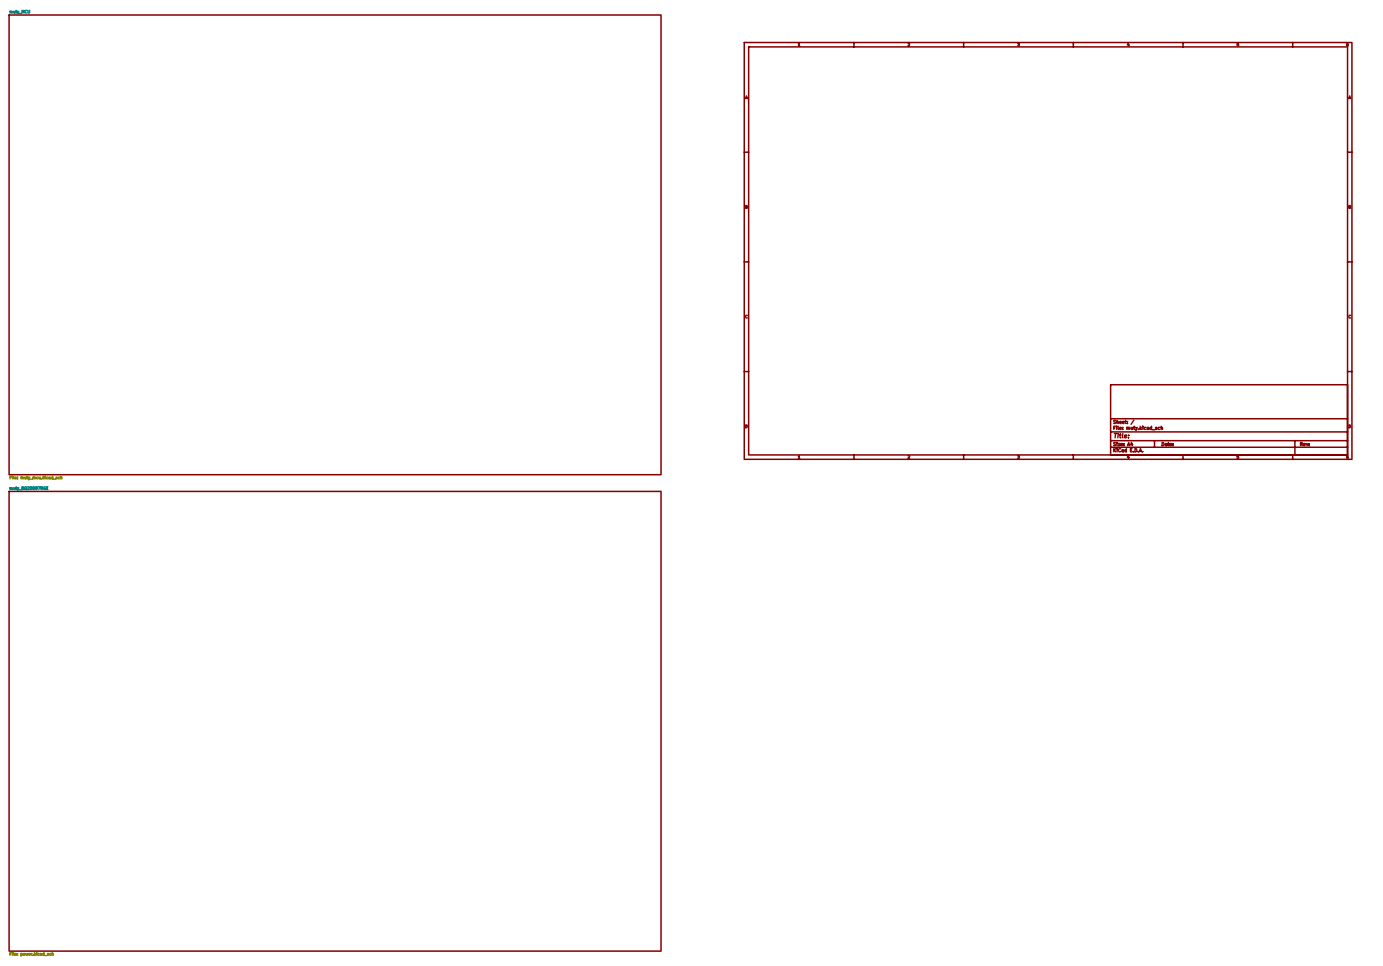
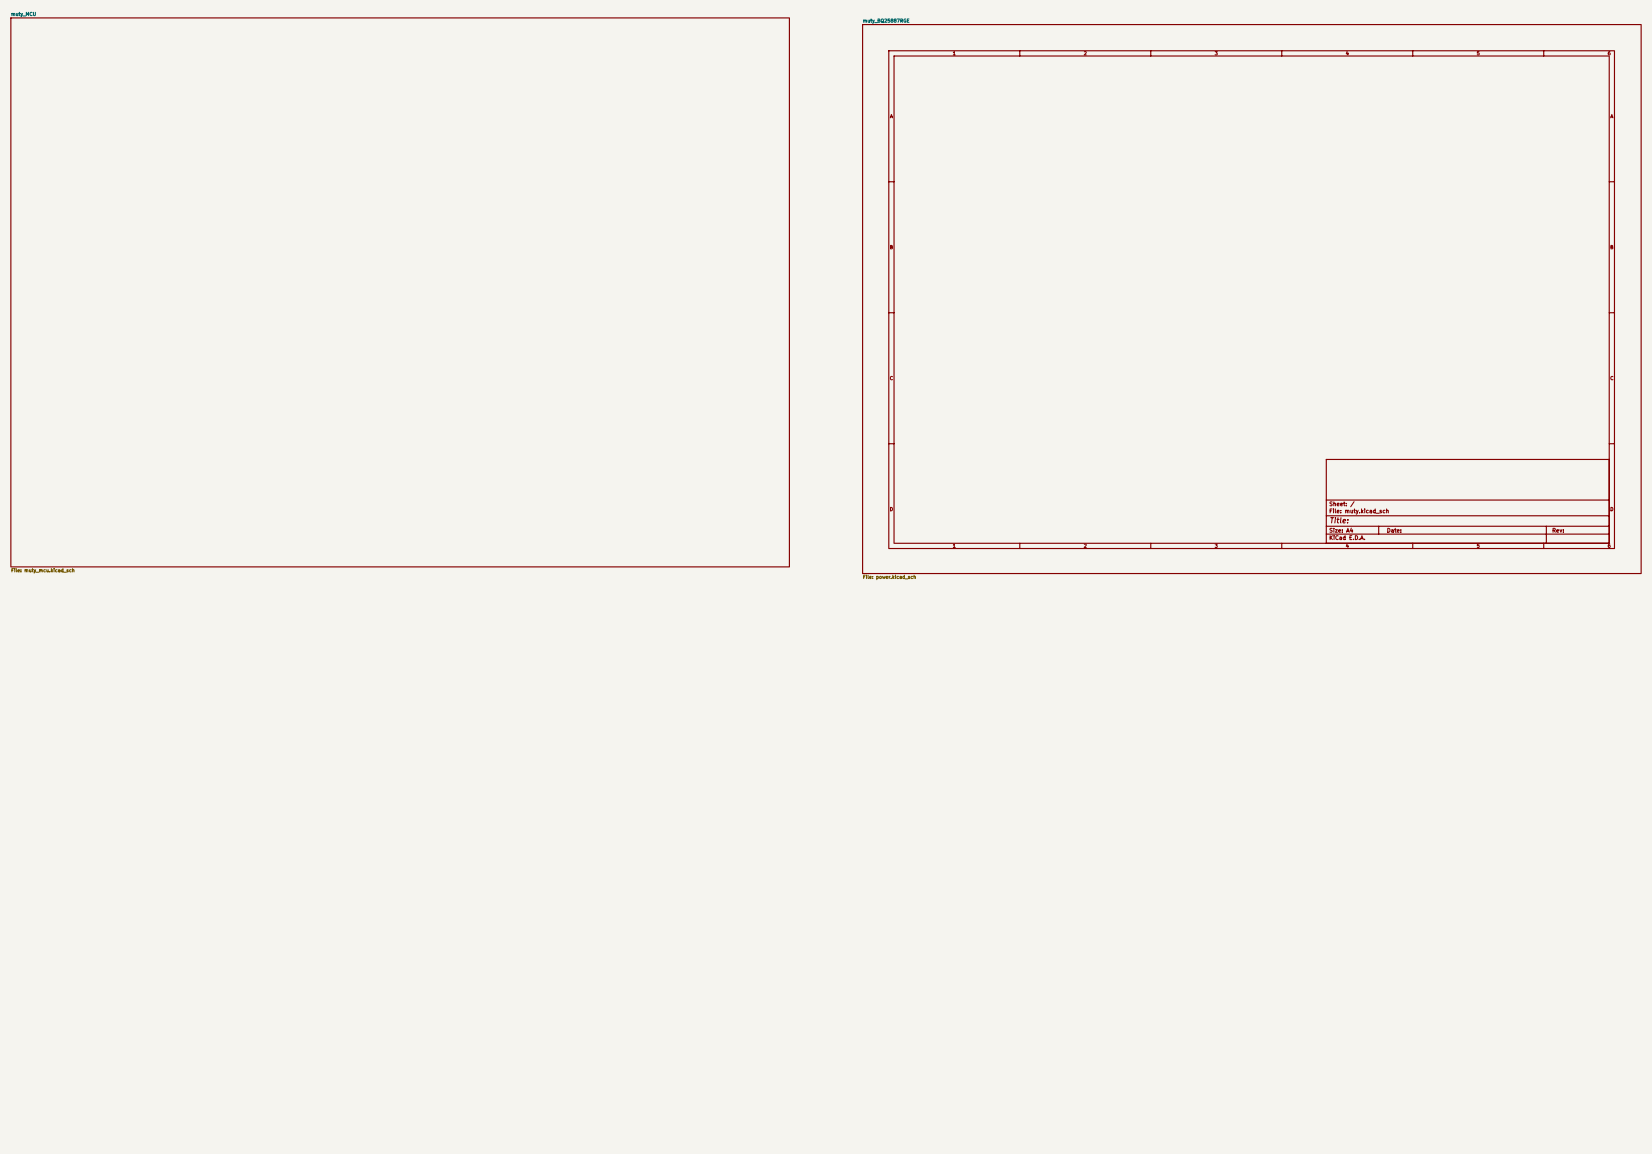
sheet position: (335, 721) -> (1251, 299)

